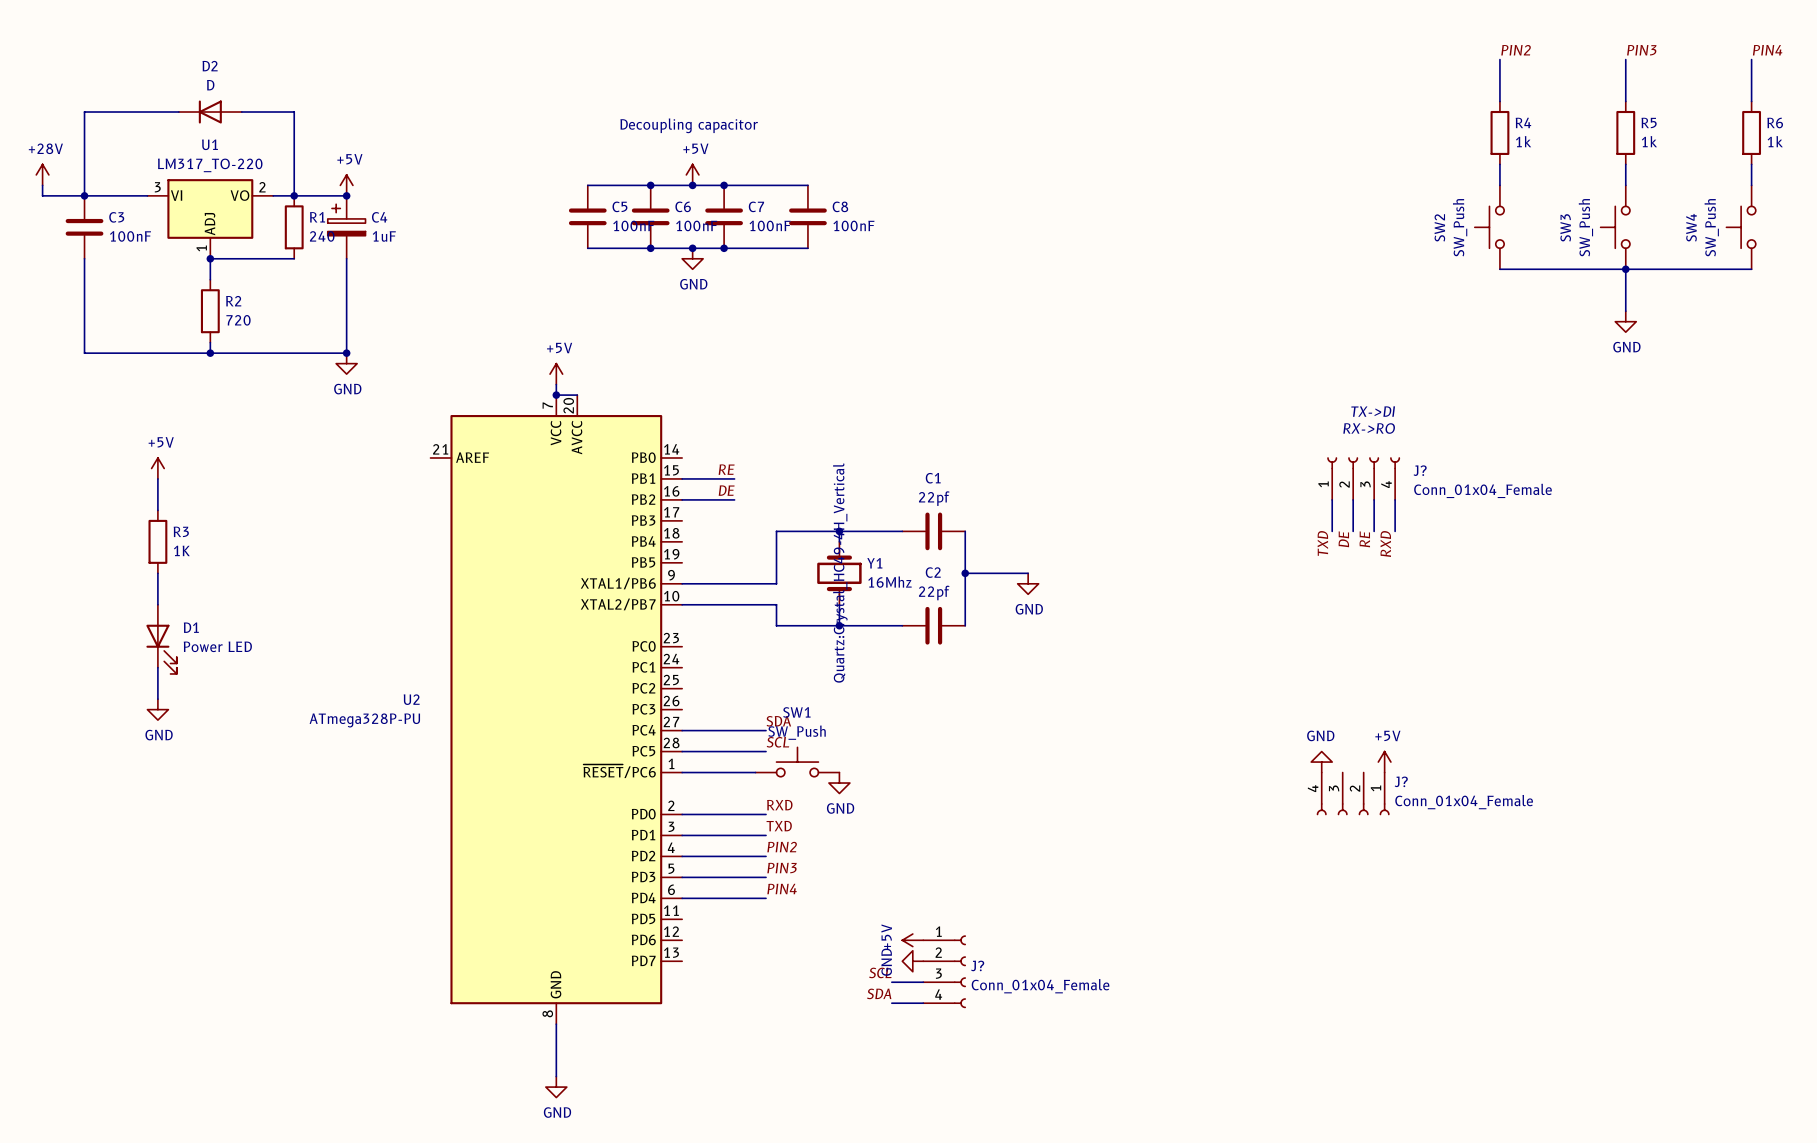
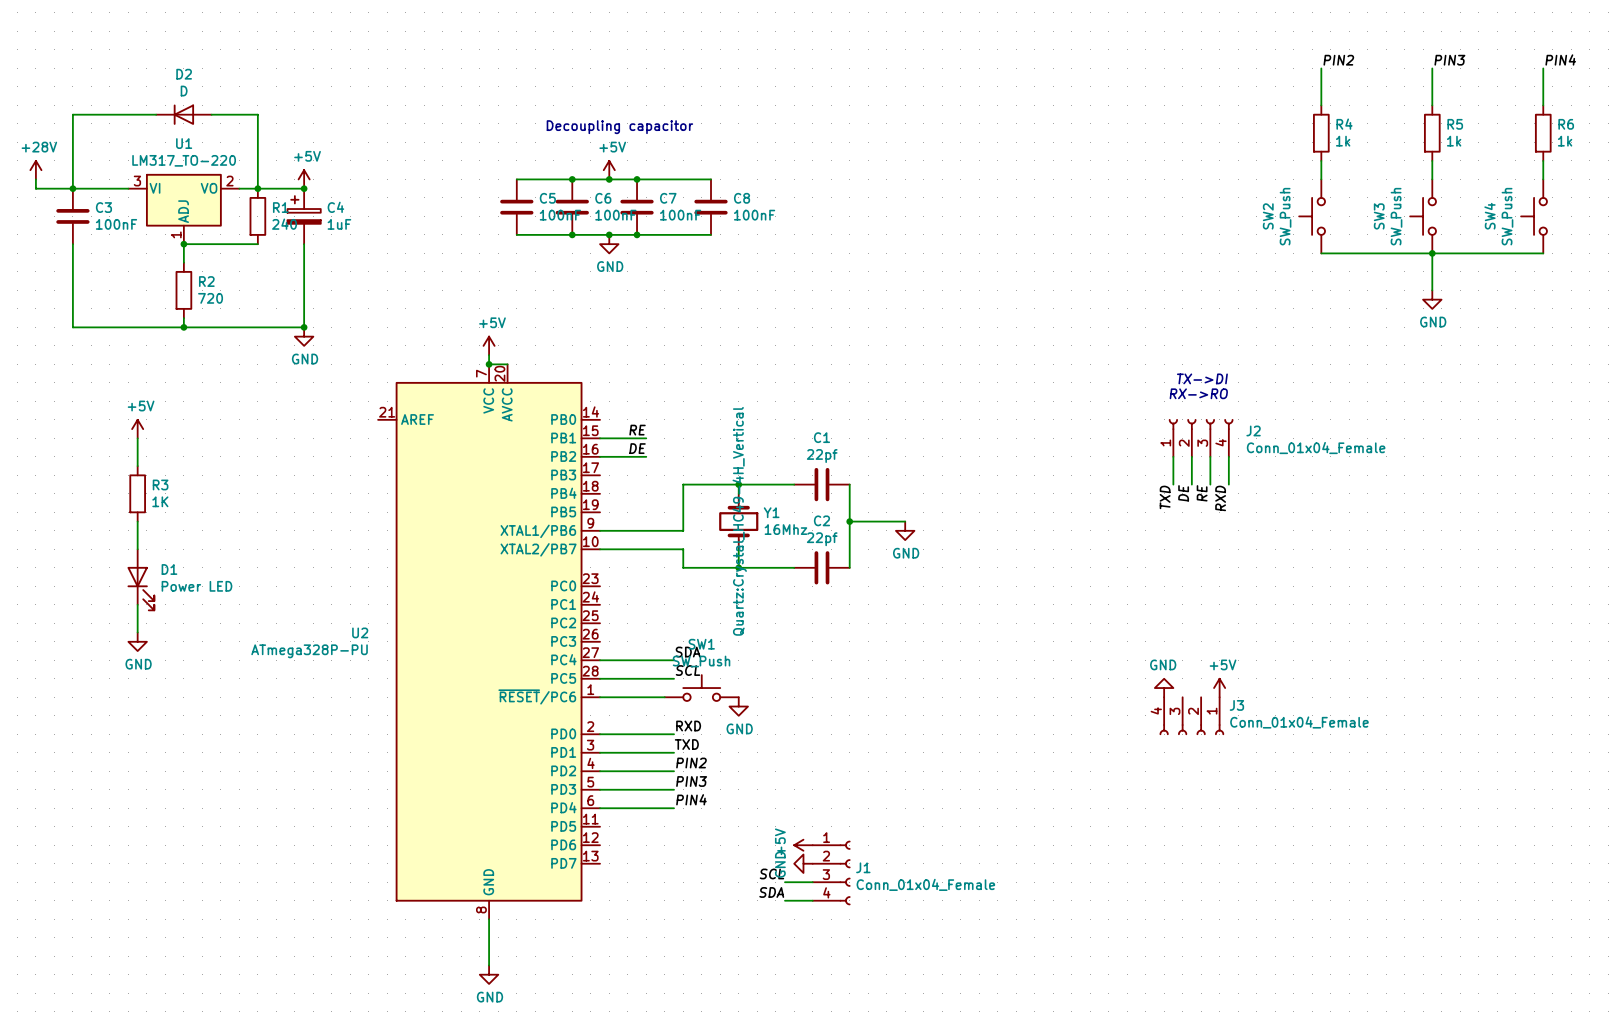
J? name: J? (1420, 470) -> J2 (1253, 430)
J? name: J? (1401, 781) -> J3 (1236, 705)
J? name: J? (977, 965) -> J1 (863, 867)

